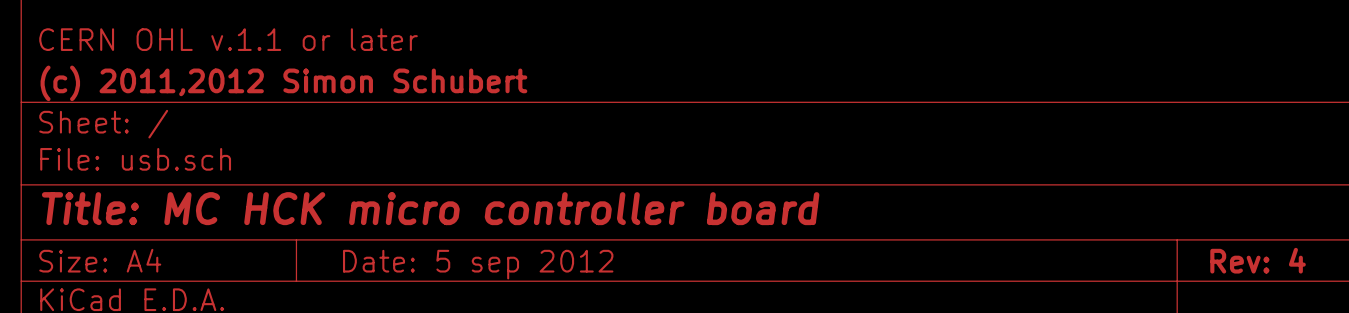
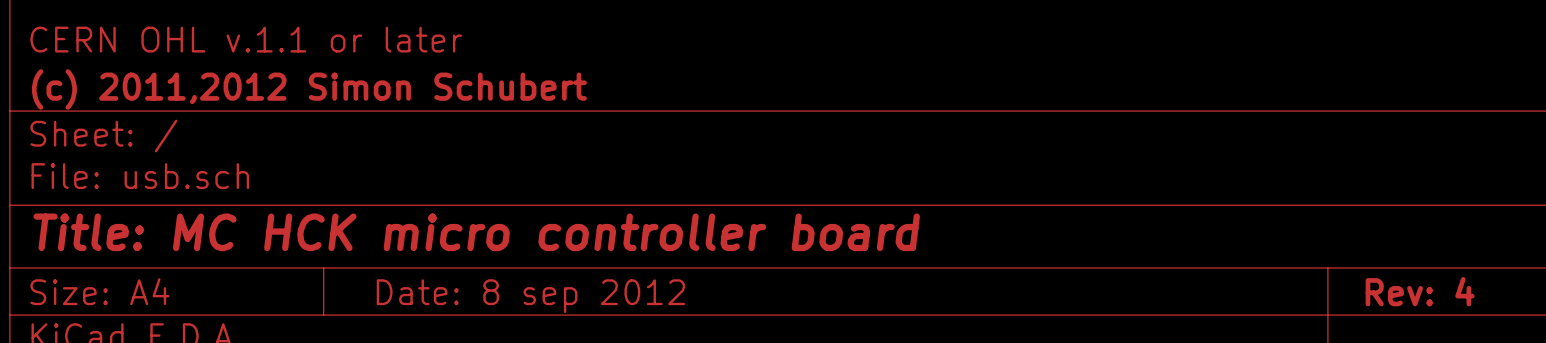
title block: Date: 5 sep 2012 (478, 264) -> Date: 8 sep 2012 (530, 296)

